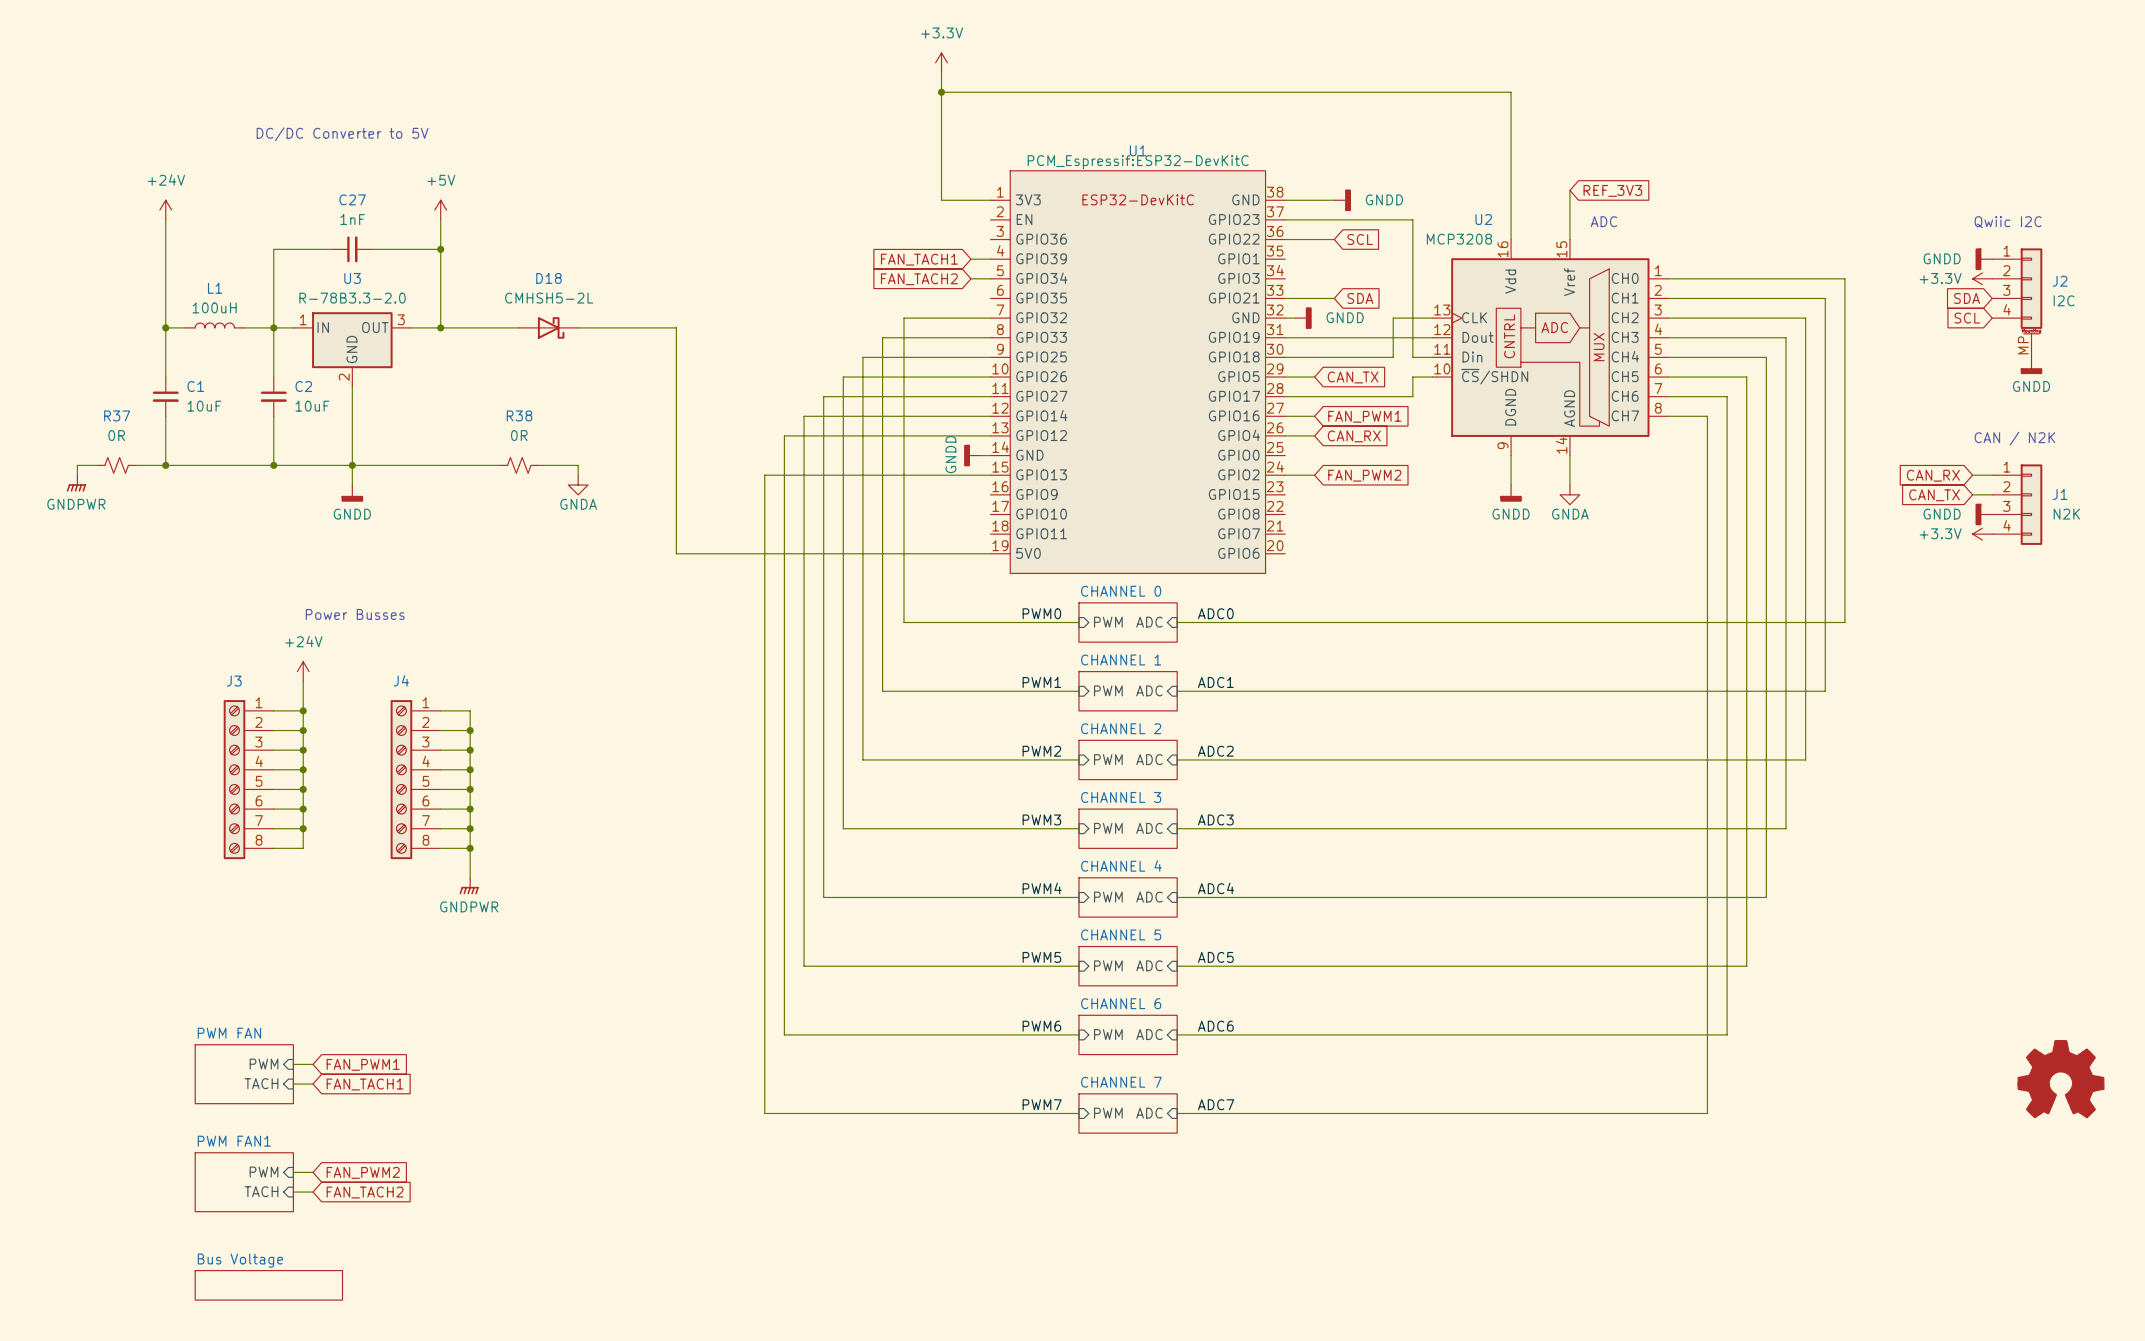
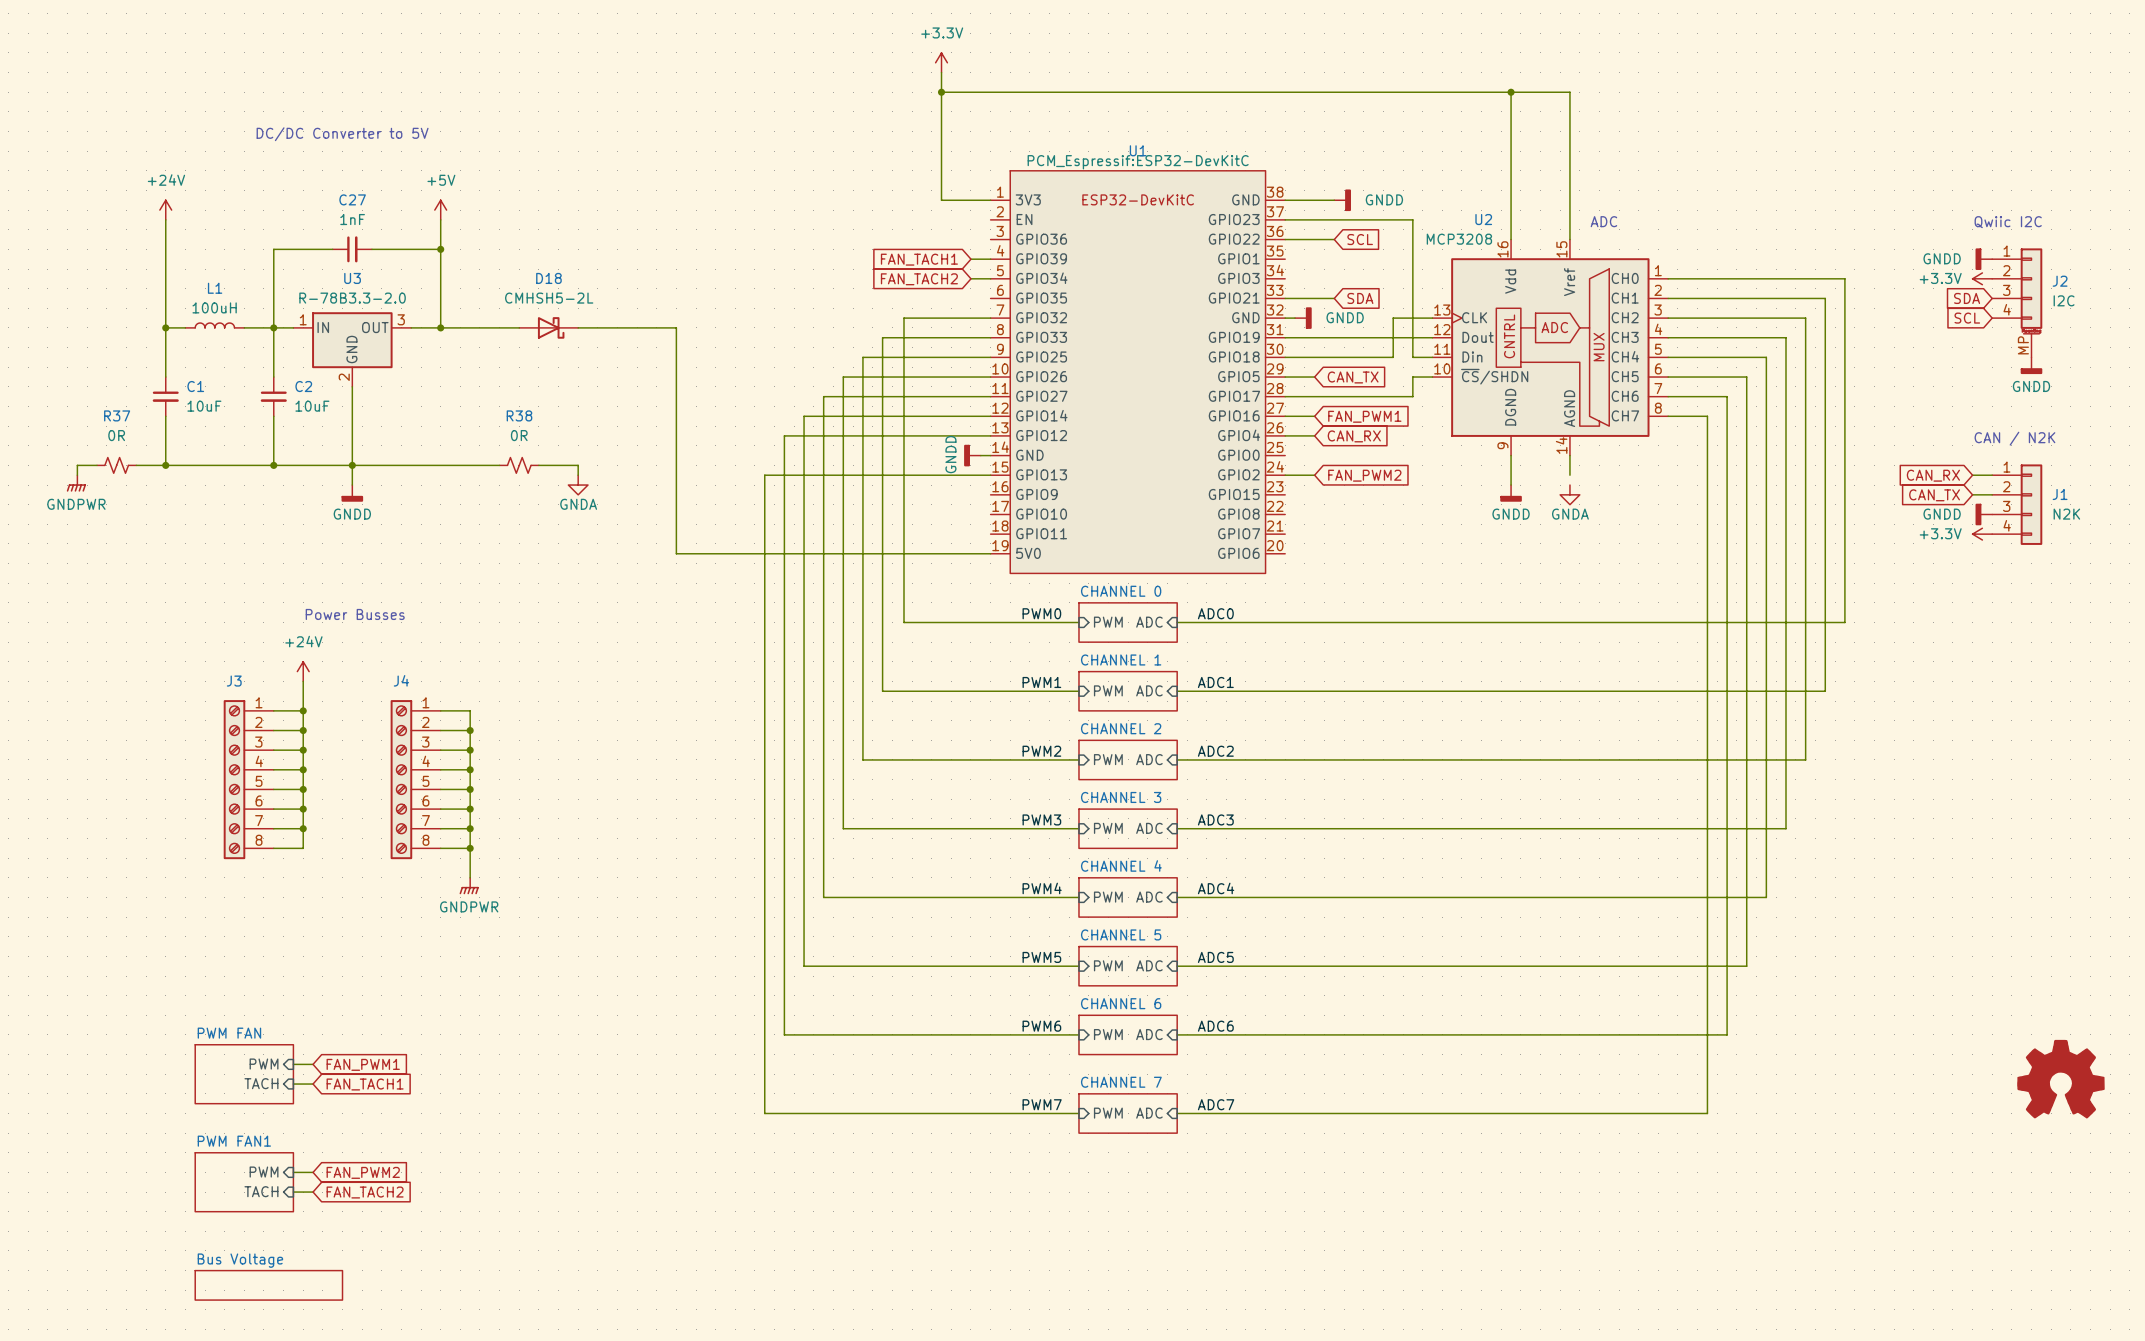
wire: none -> (1511, 92) (1569, 92) (1569, 190)
junction: none -> (1511, 92)
global label: REF_3V3 (1612, 190) -> none
wire: (1569, 475) (1569, 485) -> none

